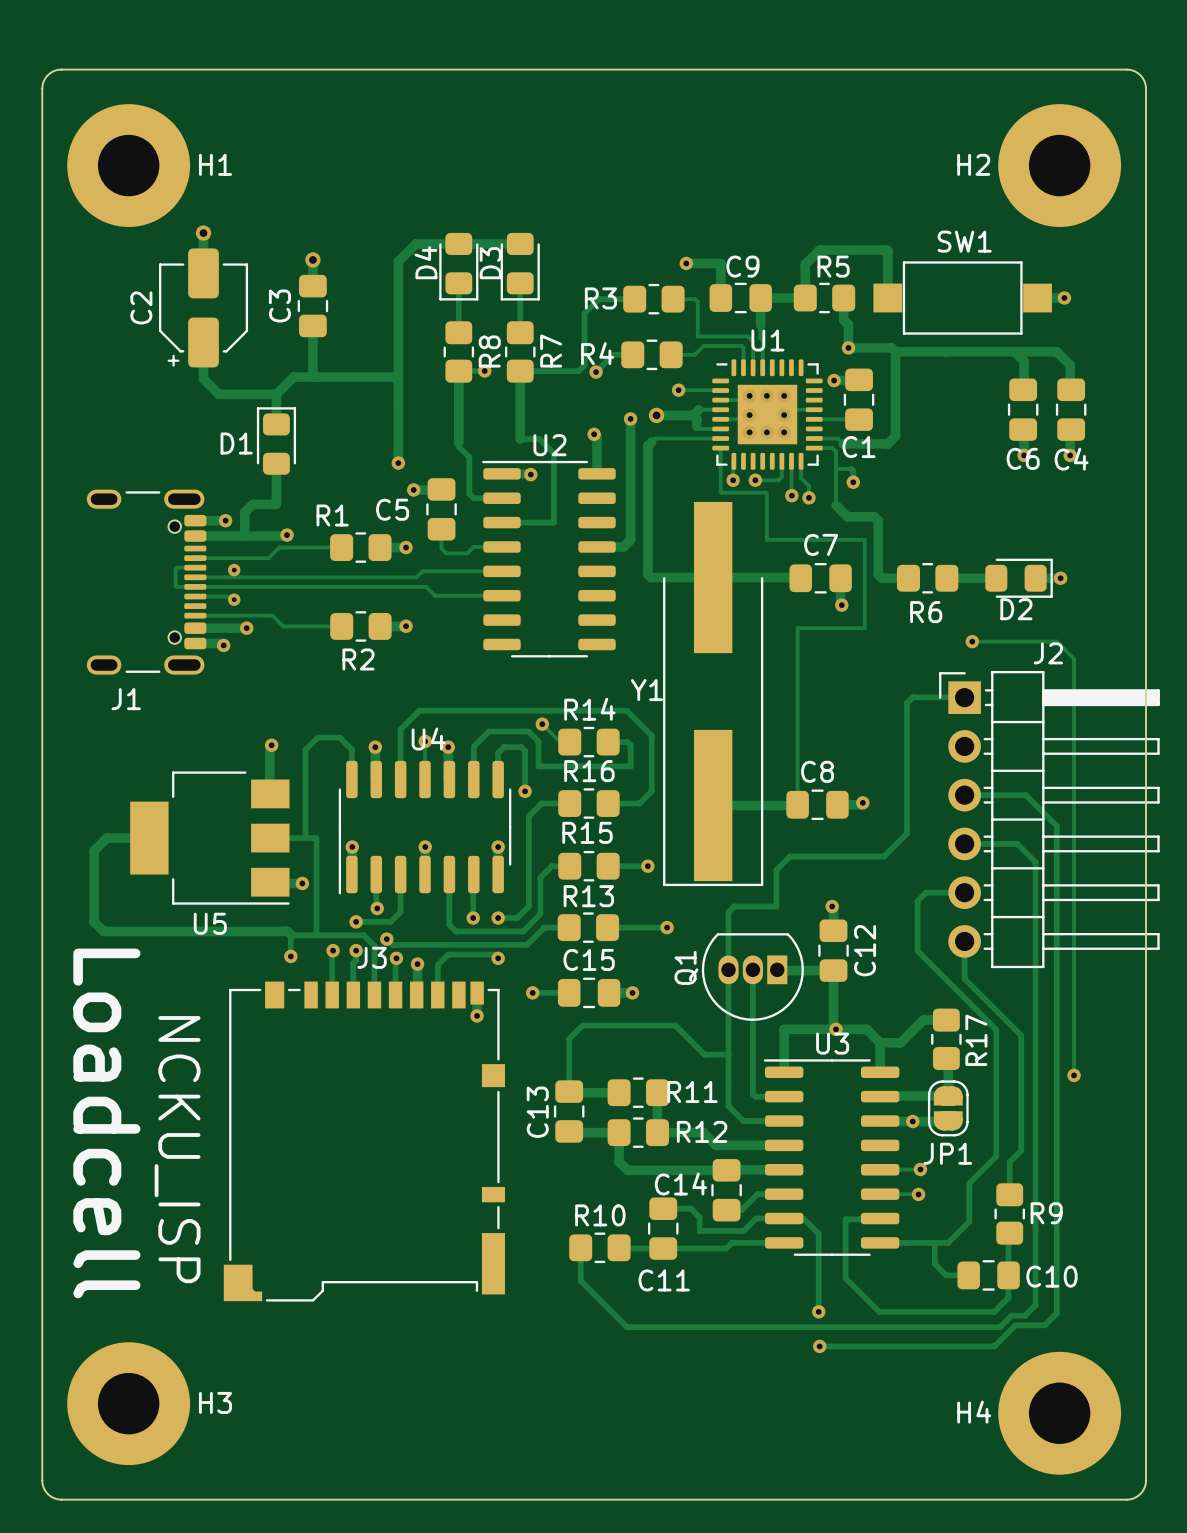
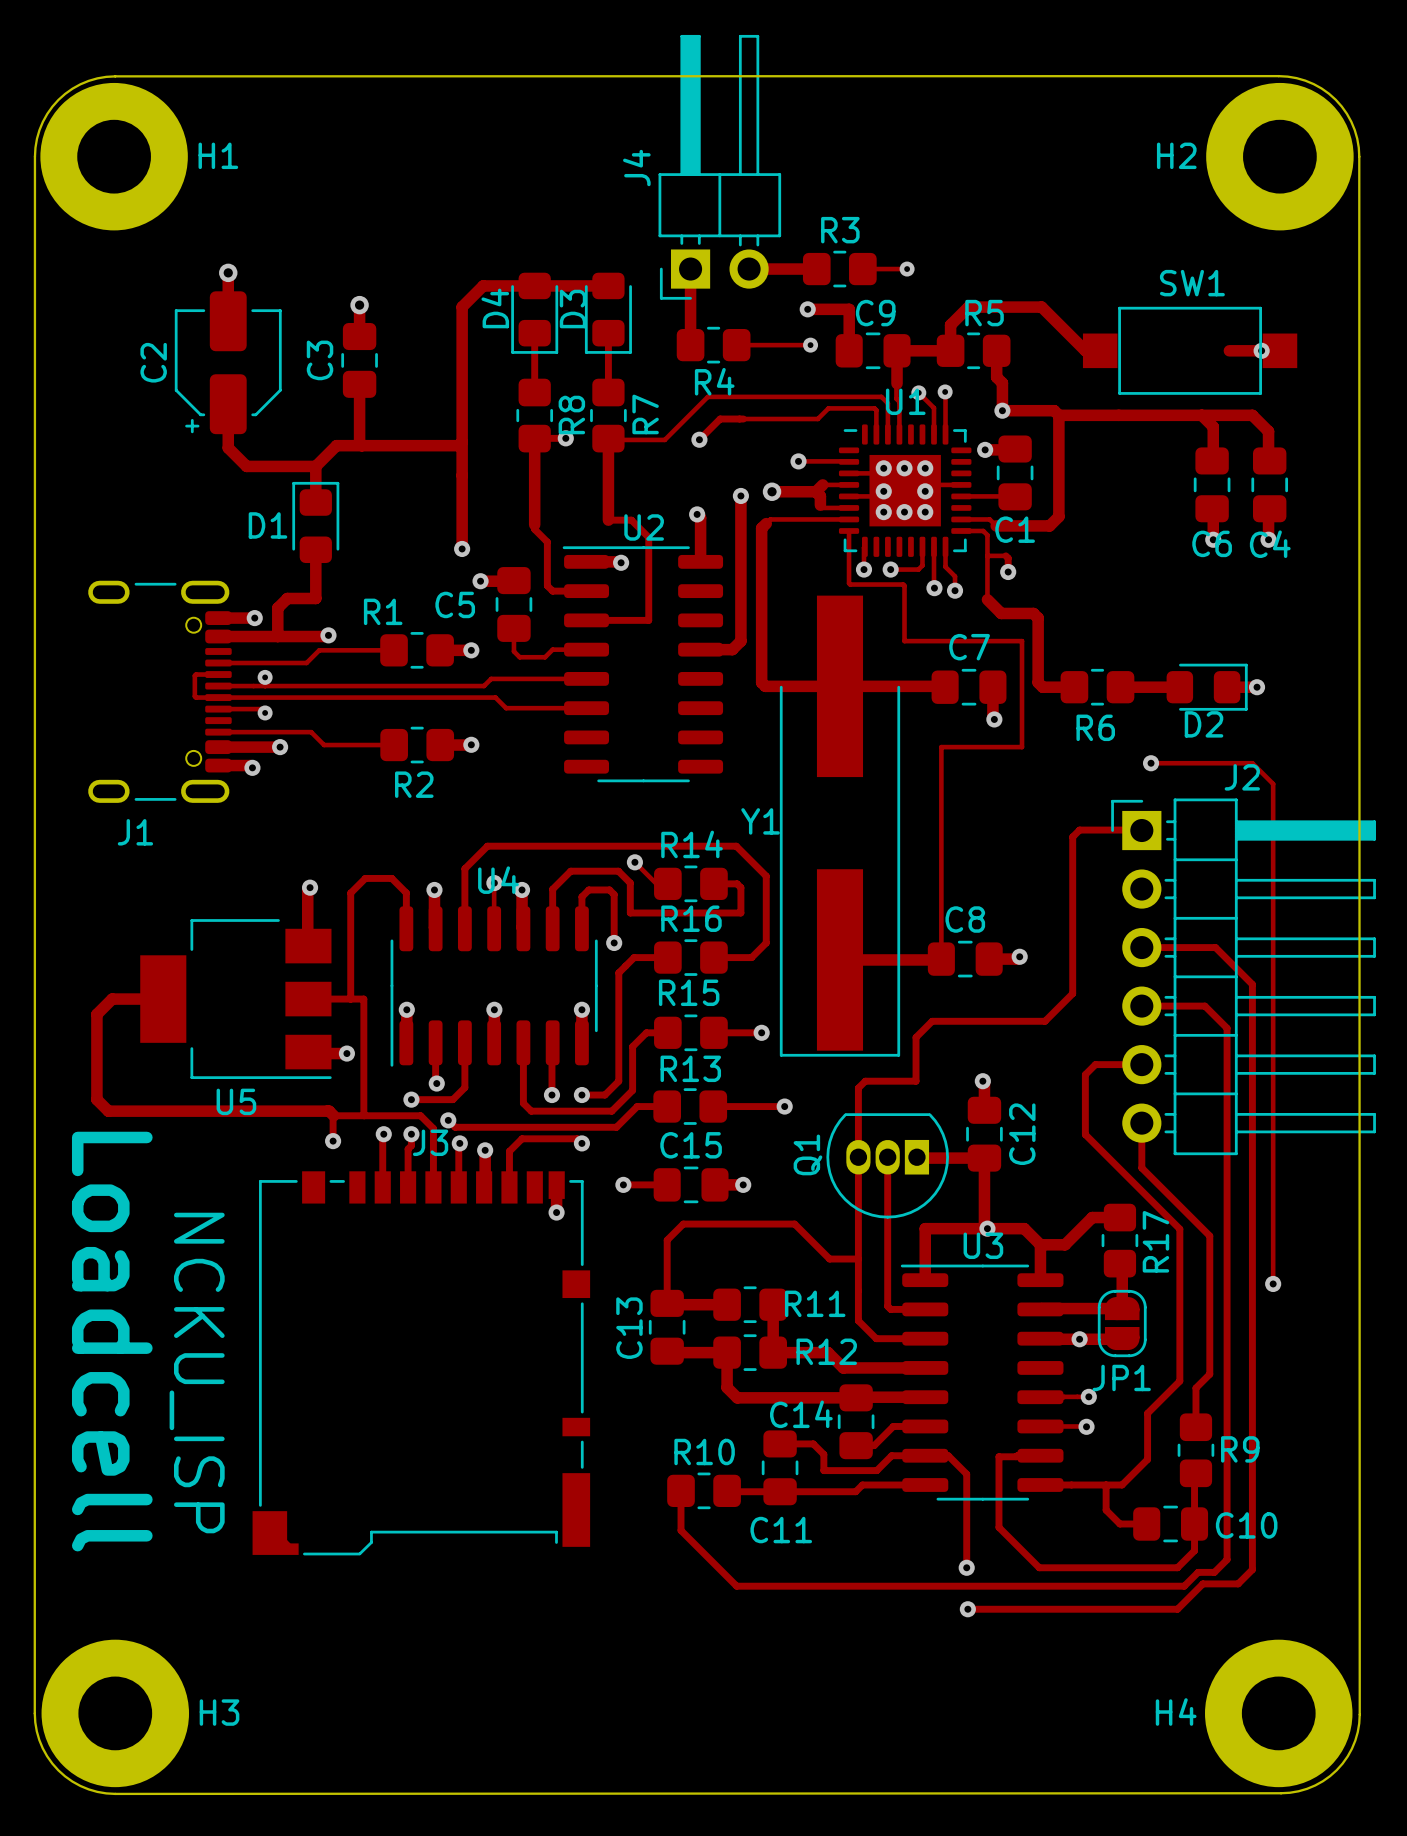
board edge: (61, 69) (1126, 69) (1135, 71) (1141, 76) (1146, 88) (1146, 1480) (1144, 1488) (1138, 1495) (1126, 1499) (61, 1499) (53, 1497) (46, 1492) (42, 1480) (42, 88) (47, 75) (61, 69) -> (1278, 76) (115, 76) (97, 78) (80, 84) (65, 93) (52, 106) (39, 130) (34, 156) (34, 1713) (36, 1731) (42, 1748) (52, 1763) (65, 1776) (88, 1789) (115, 1793) (1281, 1793) (1298, 1791) (1315, 1785) (1330, 1776) (1342, 1763) (1355, 1740) (1359, 1714) (1359, 156) (1354, 130) (1346, 113) (1335, 99) (1321, 88) (1305, 80) (1278, 76)
J4: none -> (719, 167)
H1 position: (128, 165) -> (114, 156)
H2 position: (1059, 165) -> (1279, 156)
track: none -> (690, 269) (690, 345)
track: none -> (749, 269) (816, 269)
track: none -> (862, 269) (907, 269)
via: none -> (907, 269)
track: (805, 276) (805, 264) (819, 250) (886, 250) (887, 298) -> (950, 325) (968, 307) (1041, 307) (1085, 350) (1100, 350)
track: none -> (736, 345) (810, 345)
via: none -> (810, 345)
R3 name position: R3 (600, 298) -> R3 (840, 230)
SW1 position: (962, 298) -> (1190, 350)
track: (634, 299) (598, 299) (584, 313) (584, 365) (578, 371) (520, 371) -> (821, 396) (707, 396) (664, 439) (608, 438)
R3 position: (653, 299) -> (839, 269)
track: (673, 299) (695, 299) (697, 301) (697, 336) -> none
track: none -> (945, 391) (945, 434)
via: none -> (945, 391)
track: none -> (918, 392) (934, 408) (934, 434)
via: none -> (918, 392)
R4 name position: R4 (597, 353) -> R4 (714, 381)
track: none -> (743, 419) (789, 419)
R4 position: (651, 354) -> (713, 345)
H3 position: (128, 1403) -> (115, 1713)
H4 position: (1059, 1413) -> (1278, 1713)

